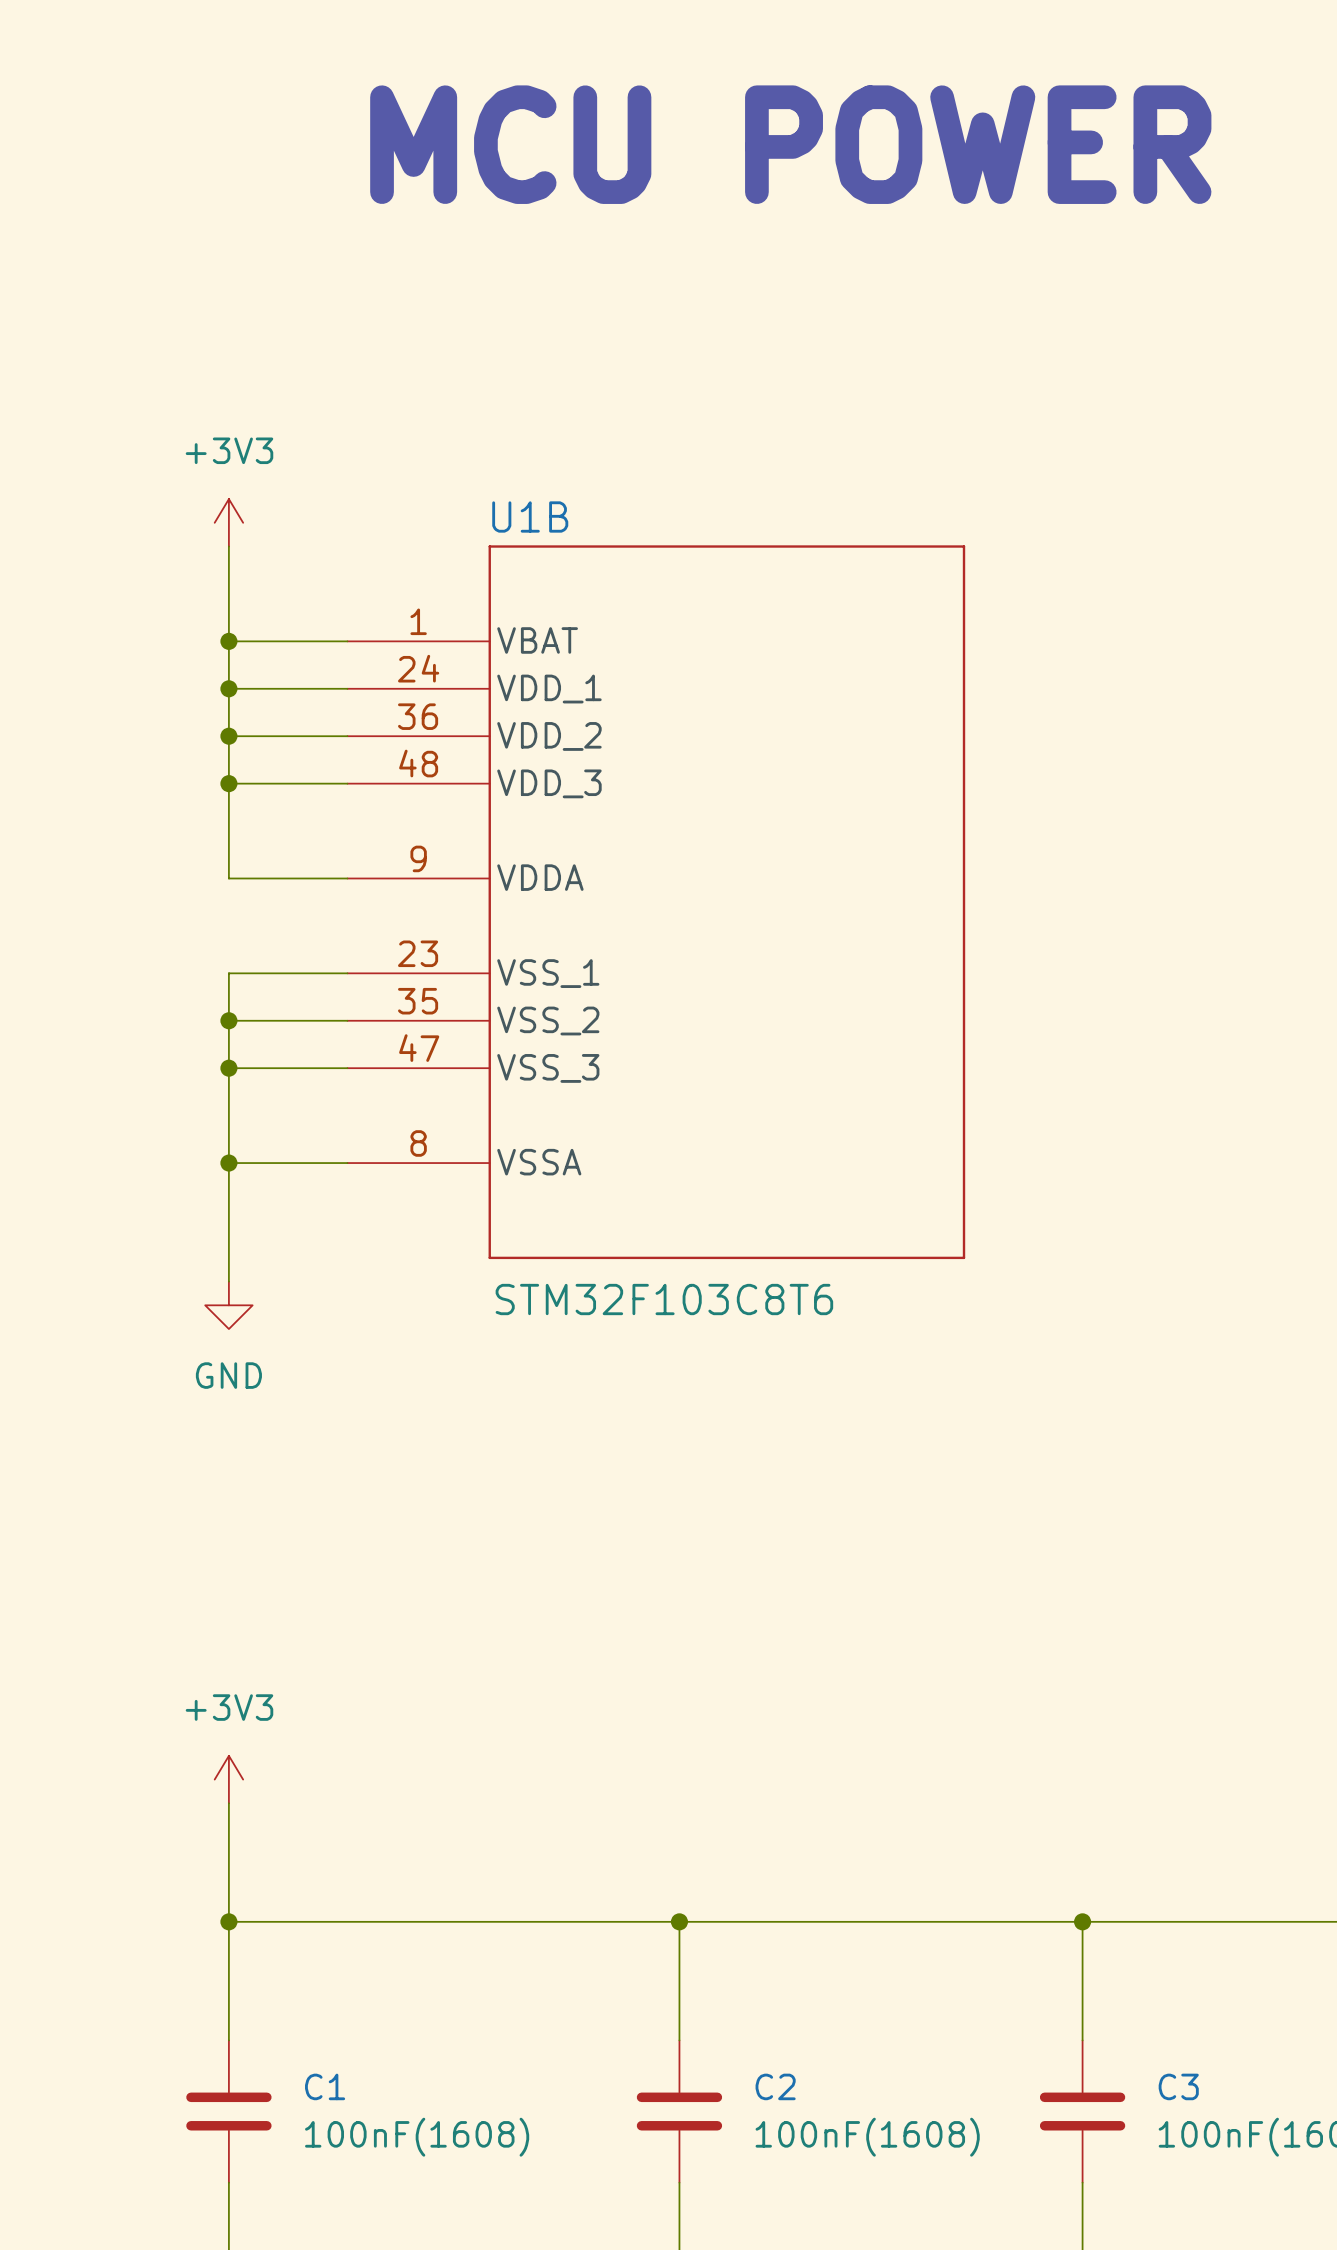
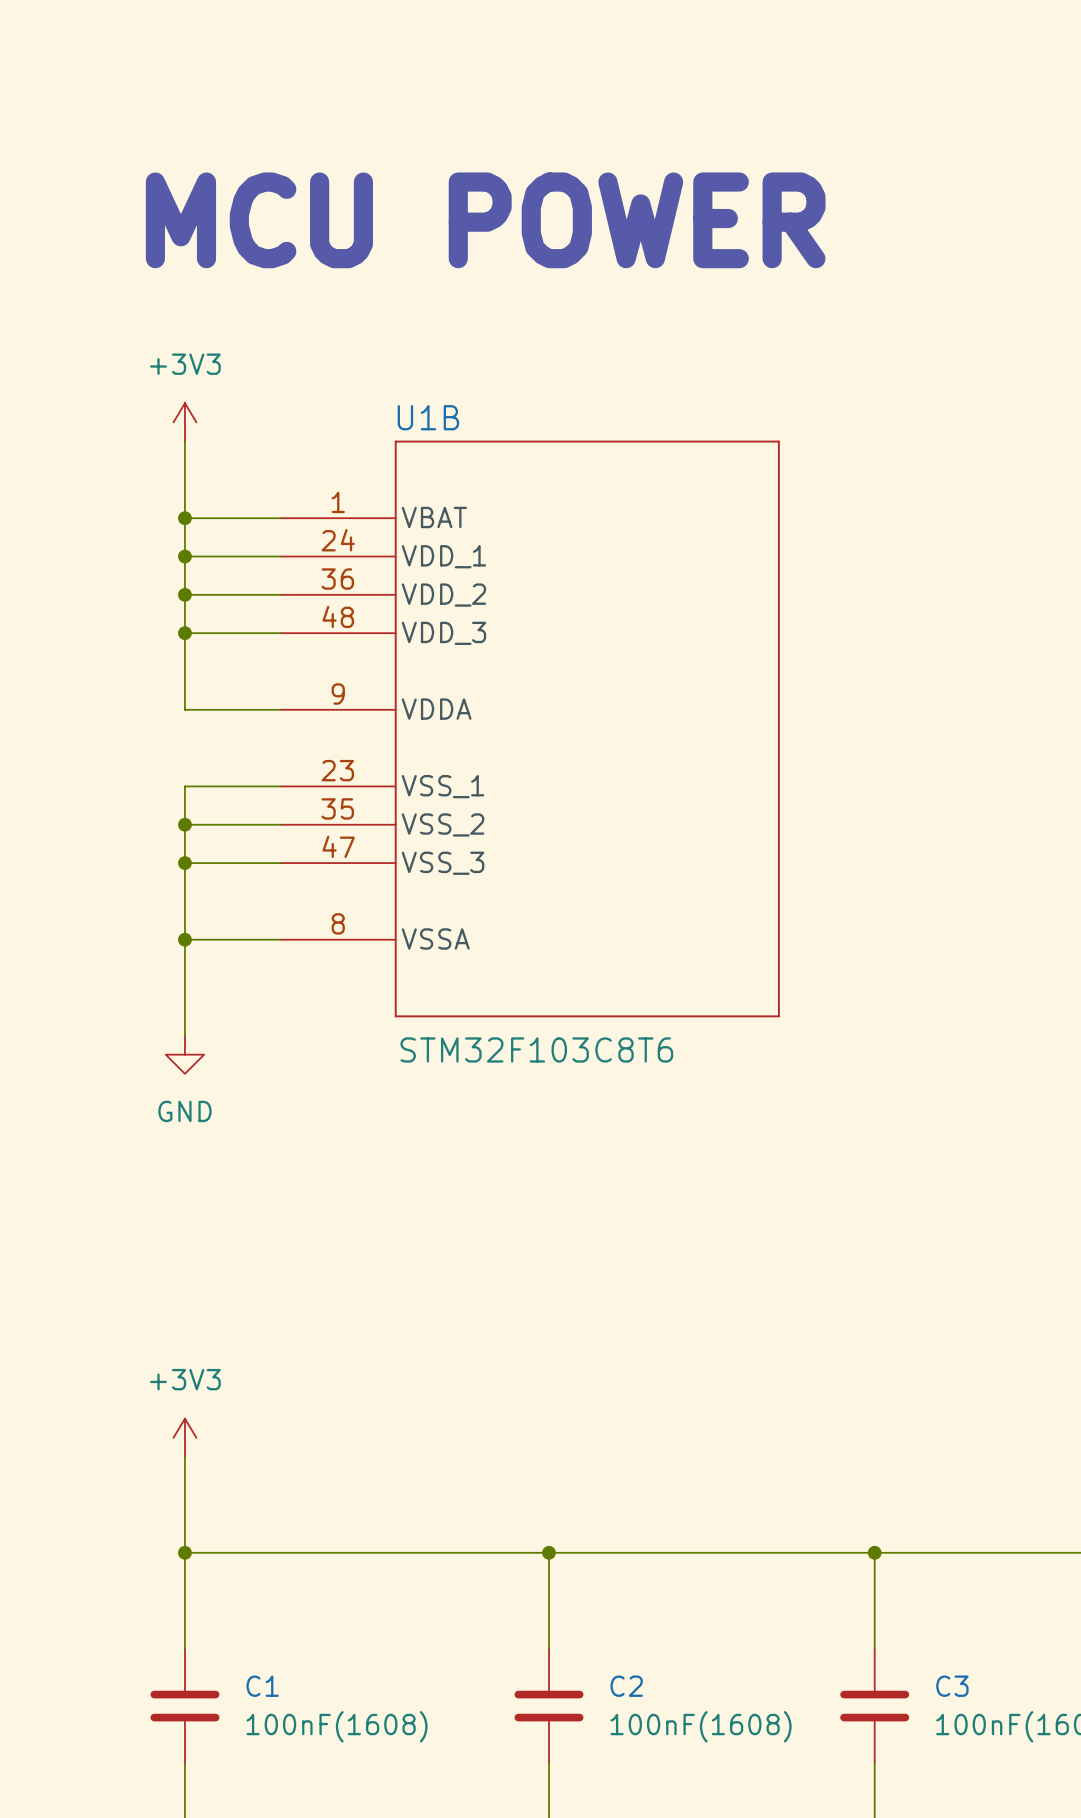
text position: MCU POWER (790, 144) -> MCU POWER (485, 220)

